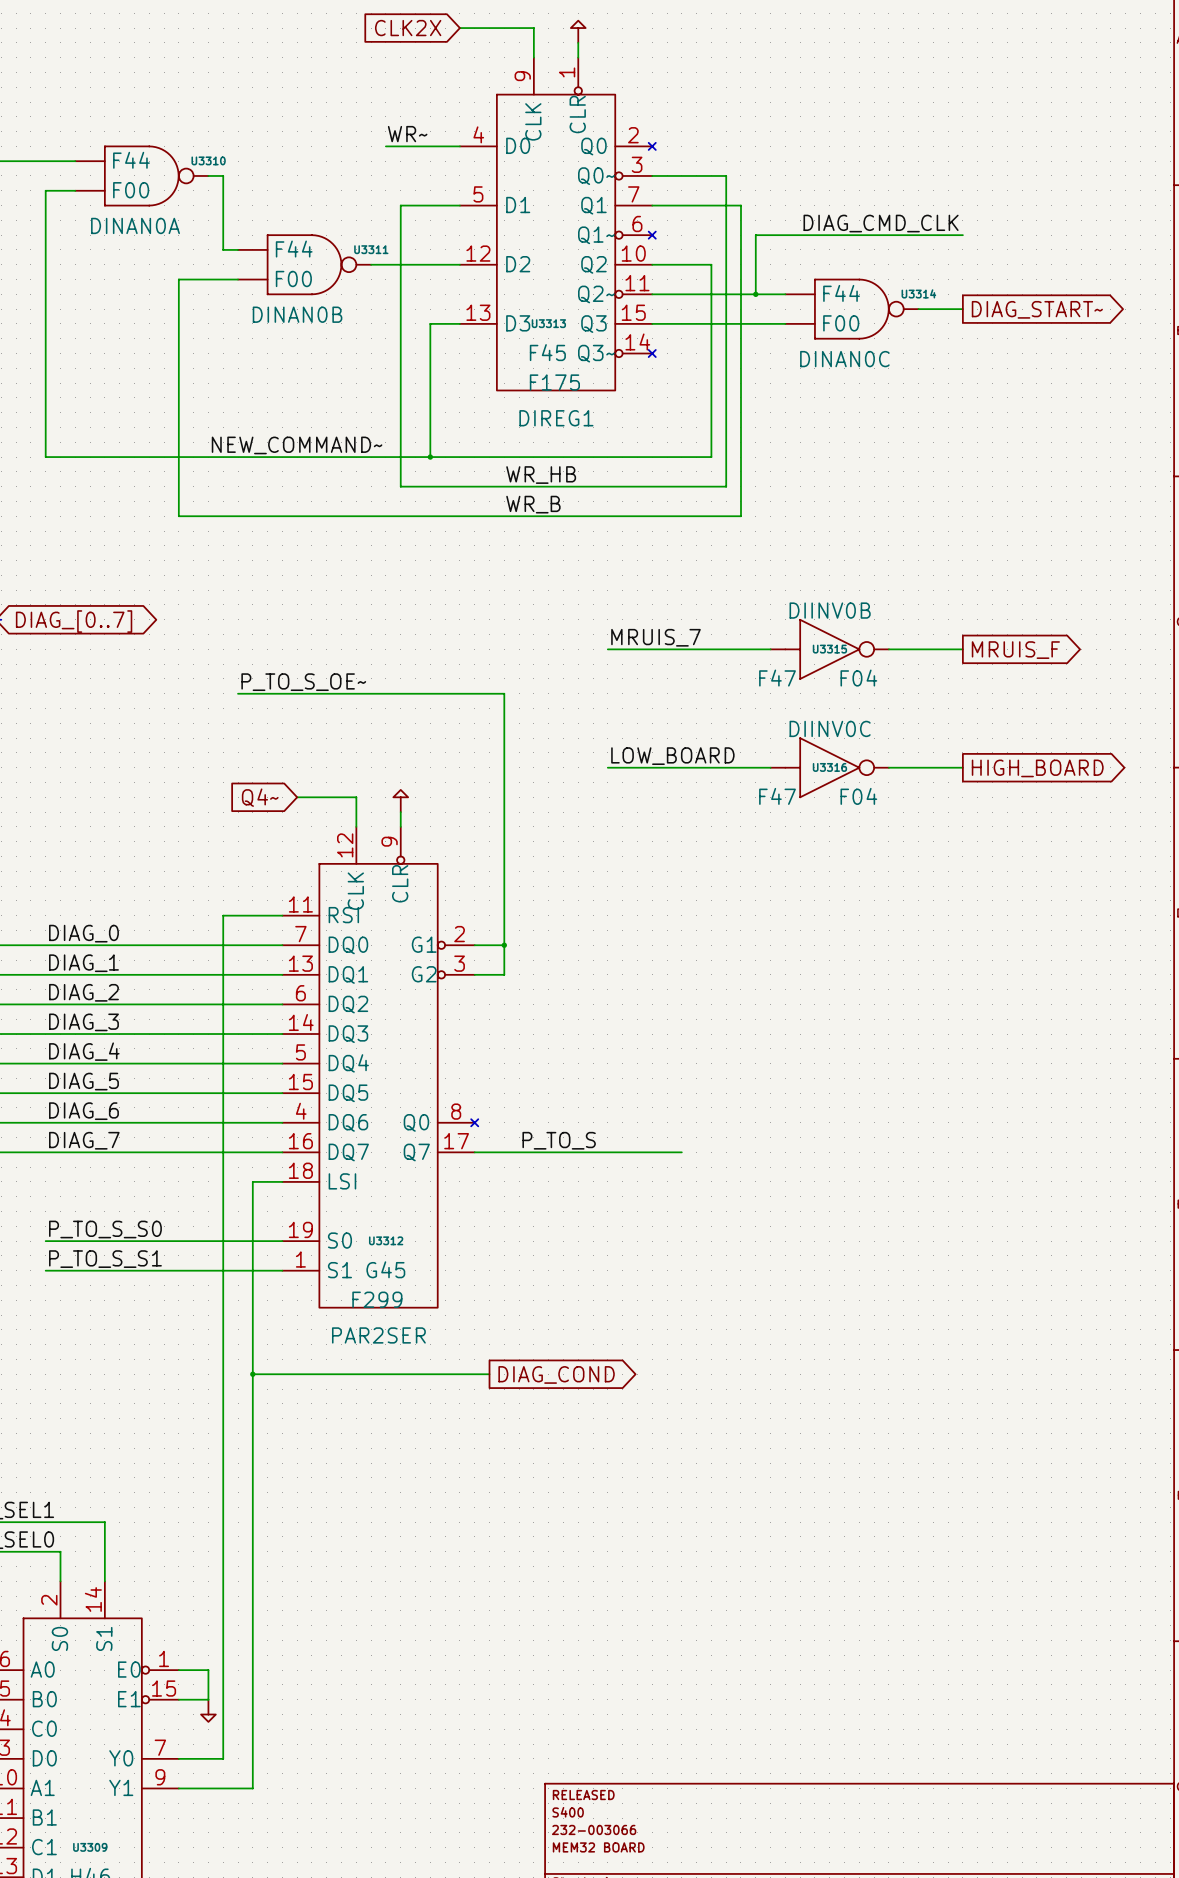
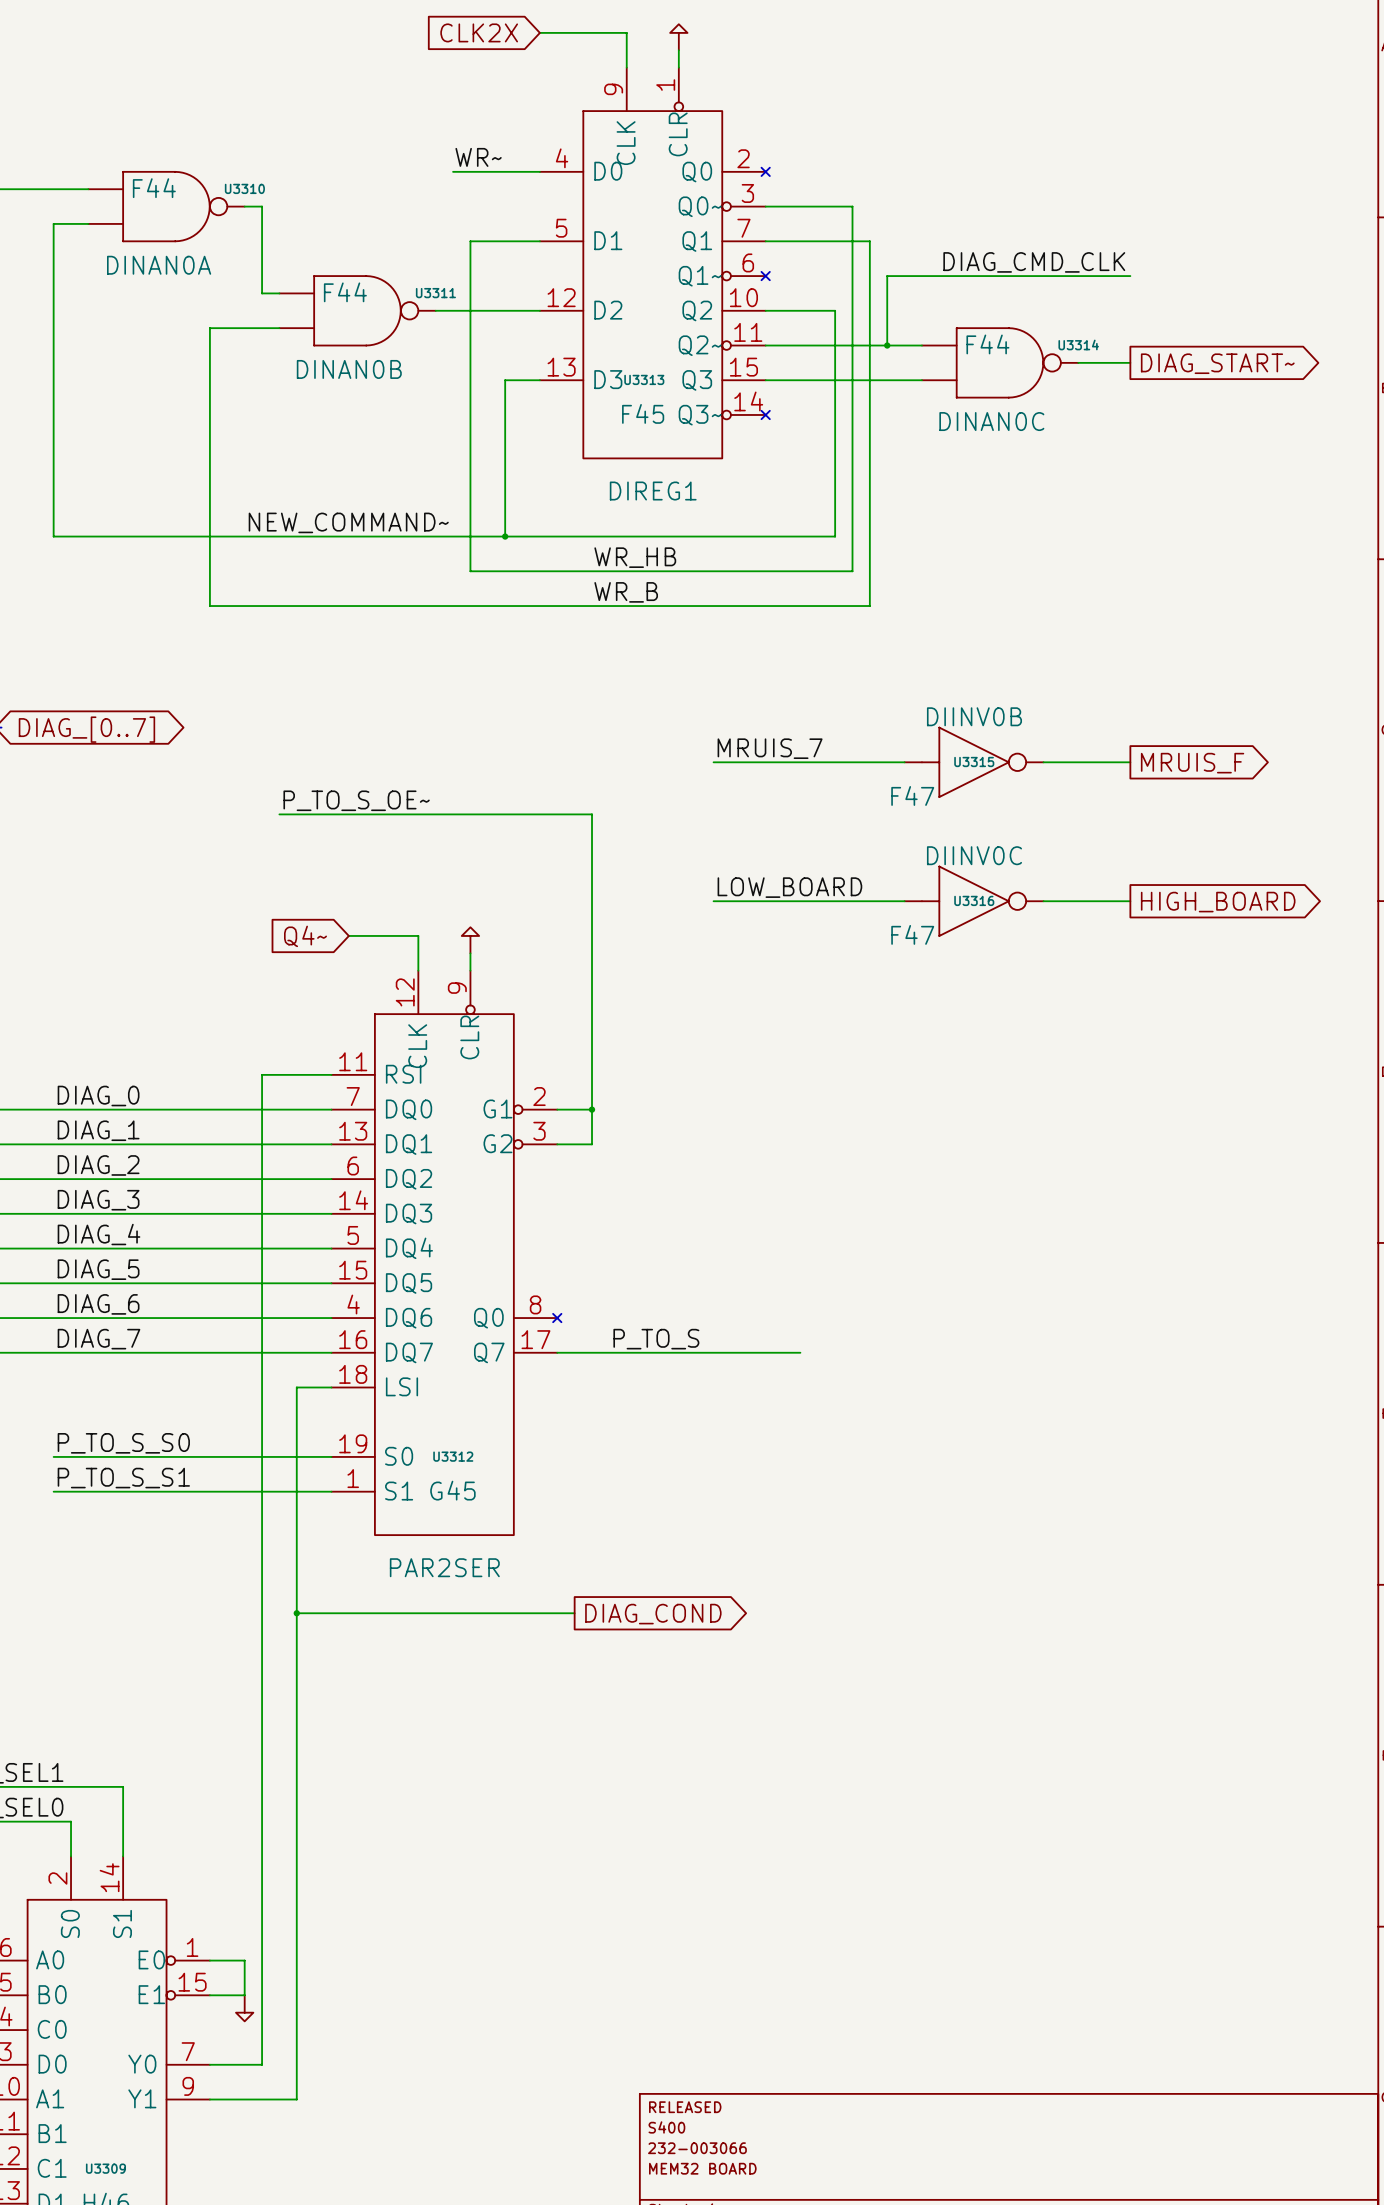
U3310 value: F00 (131, 190) -> none
U3311 value: F00 (293, 278) -> none
U3314 value: F00 (841, 323) -> none
U3313 value: F175 (554, 382) -> none
U3315 value: F04 (858, 678) -> none
U3316 value: F04 (858, 796) -> none
U3312 value: F299 (377, 1299) -> none

